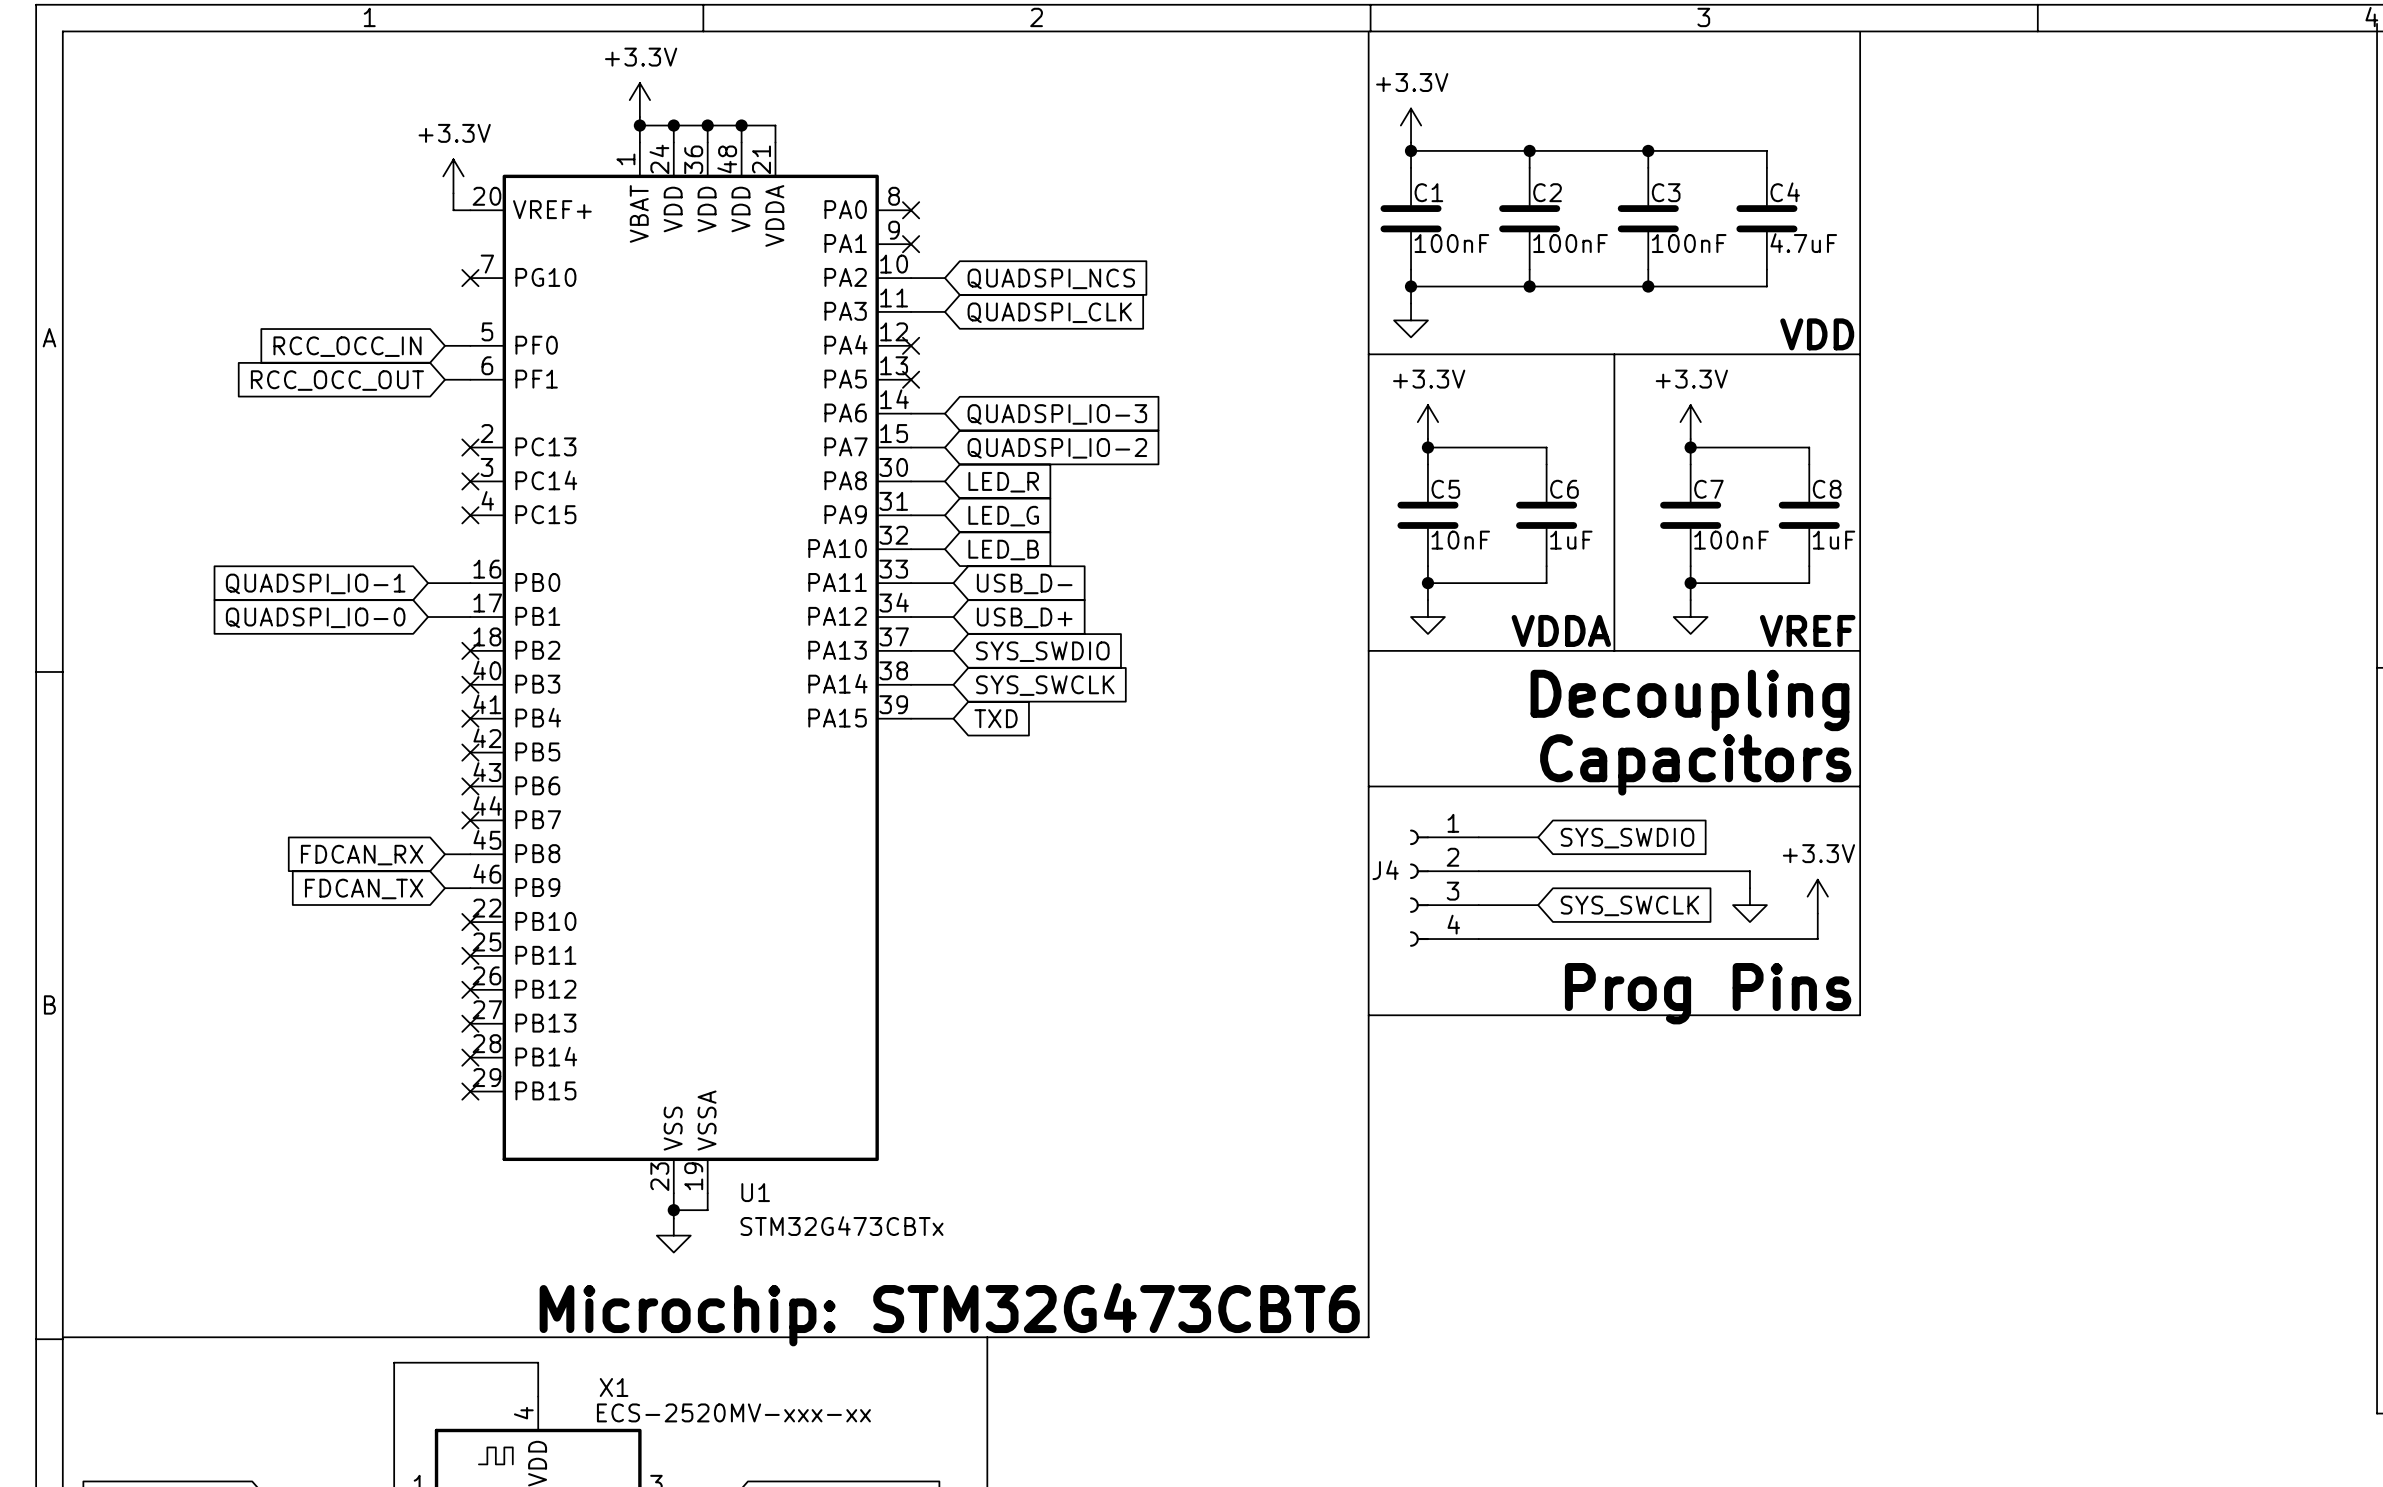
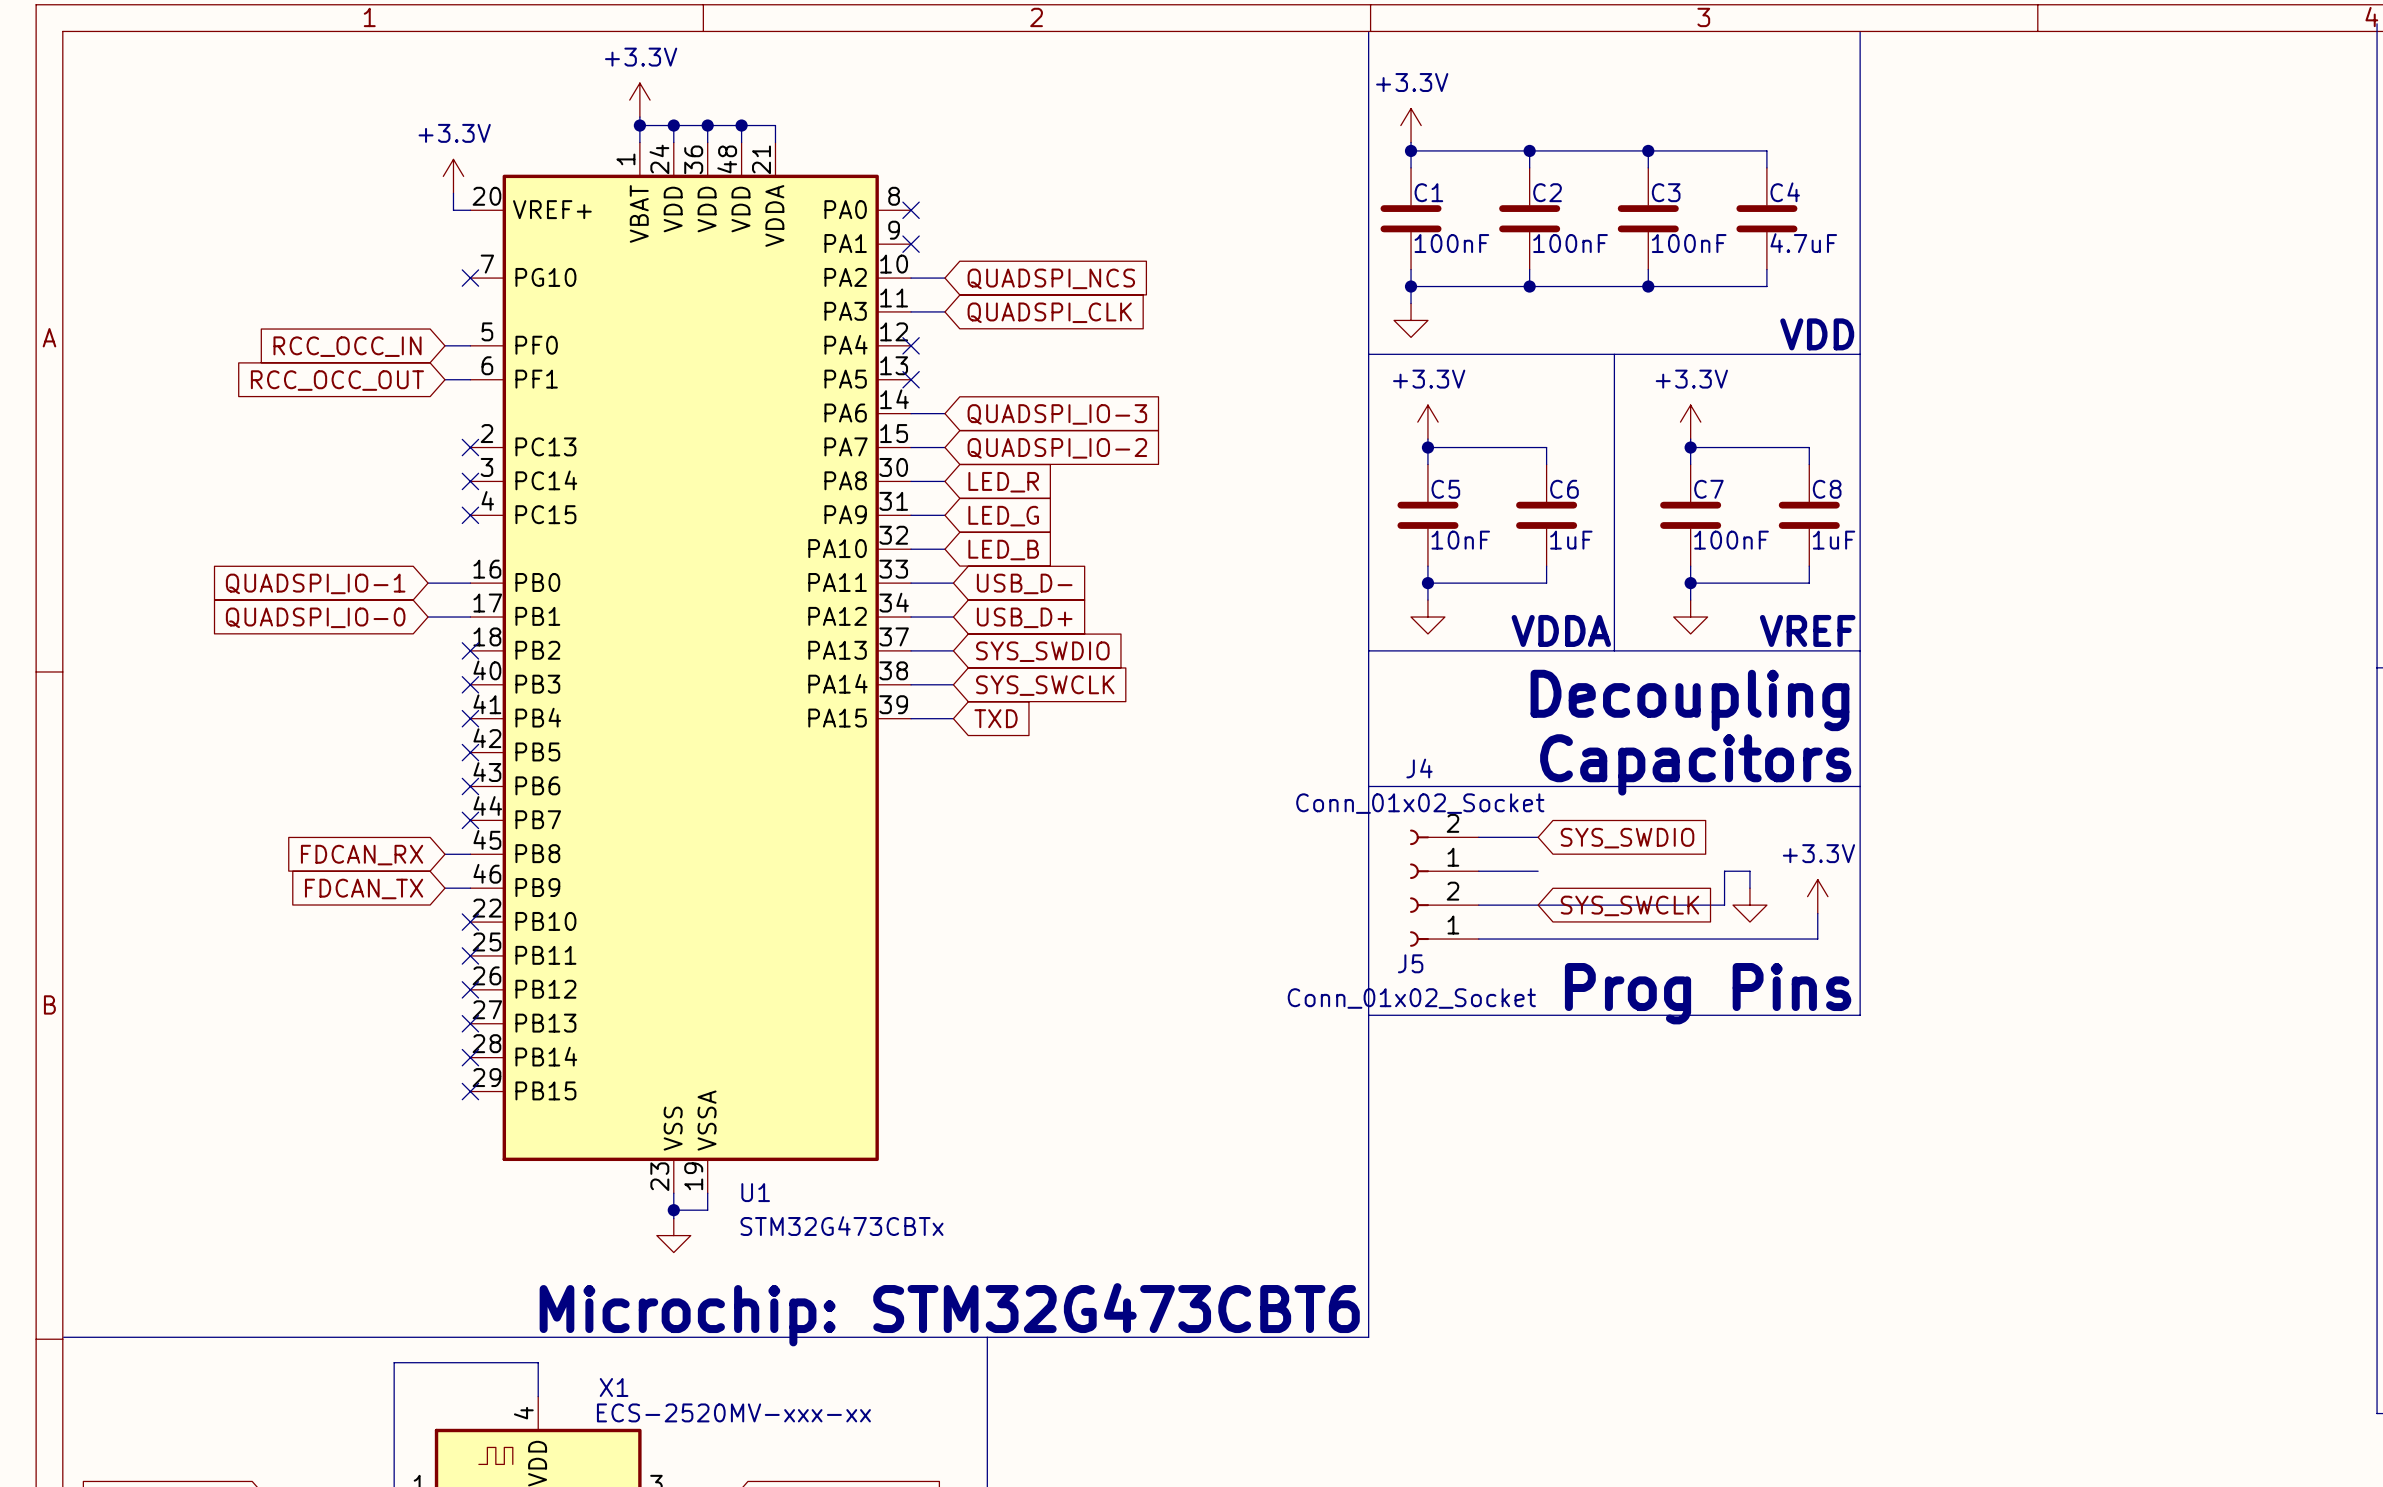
J4 value: none -> Conn_01x02_Socket (1420, 803)
J4 symbol: [1410, 829, 1479, 947] -> [1410, 829, 1479, 880]
J4 name position: J4 (1385, 870) -> J4 (1419, 768)
wire: (1538, 871) (1724, 871) -> (1538, 905) (1724, 905) (1724, 871)
J5: none -> Conn_01x02_Socket (1444, 922)

